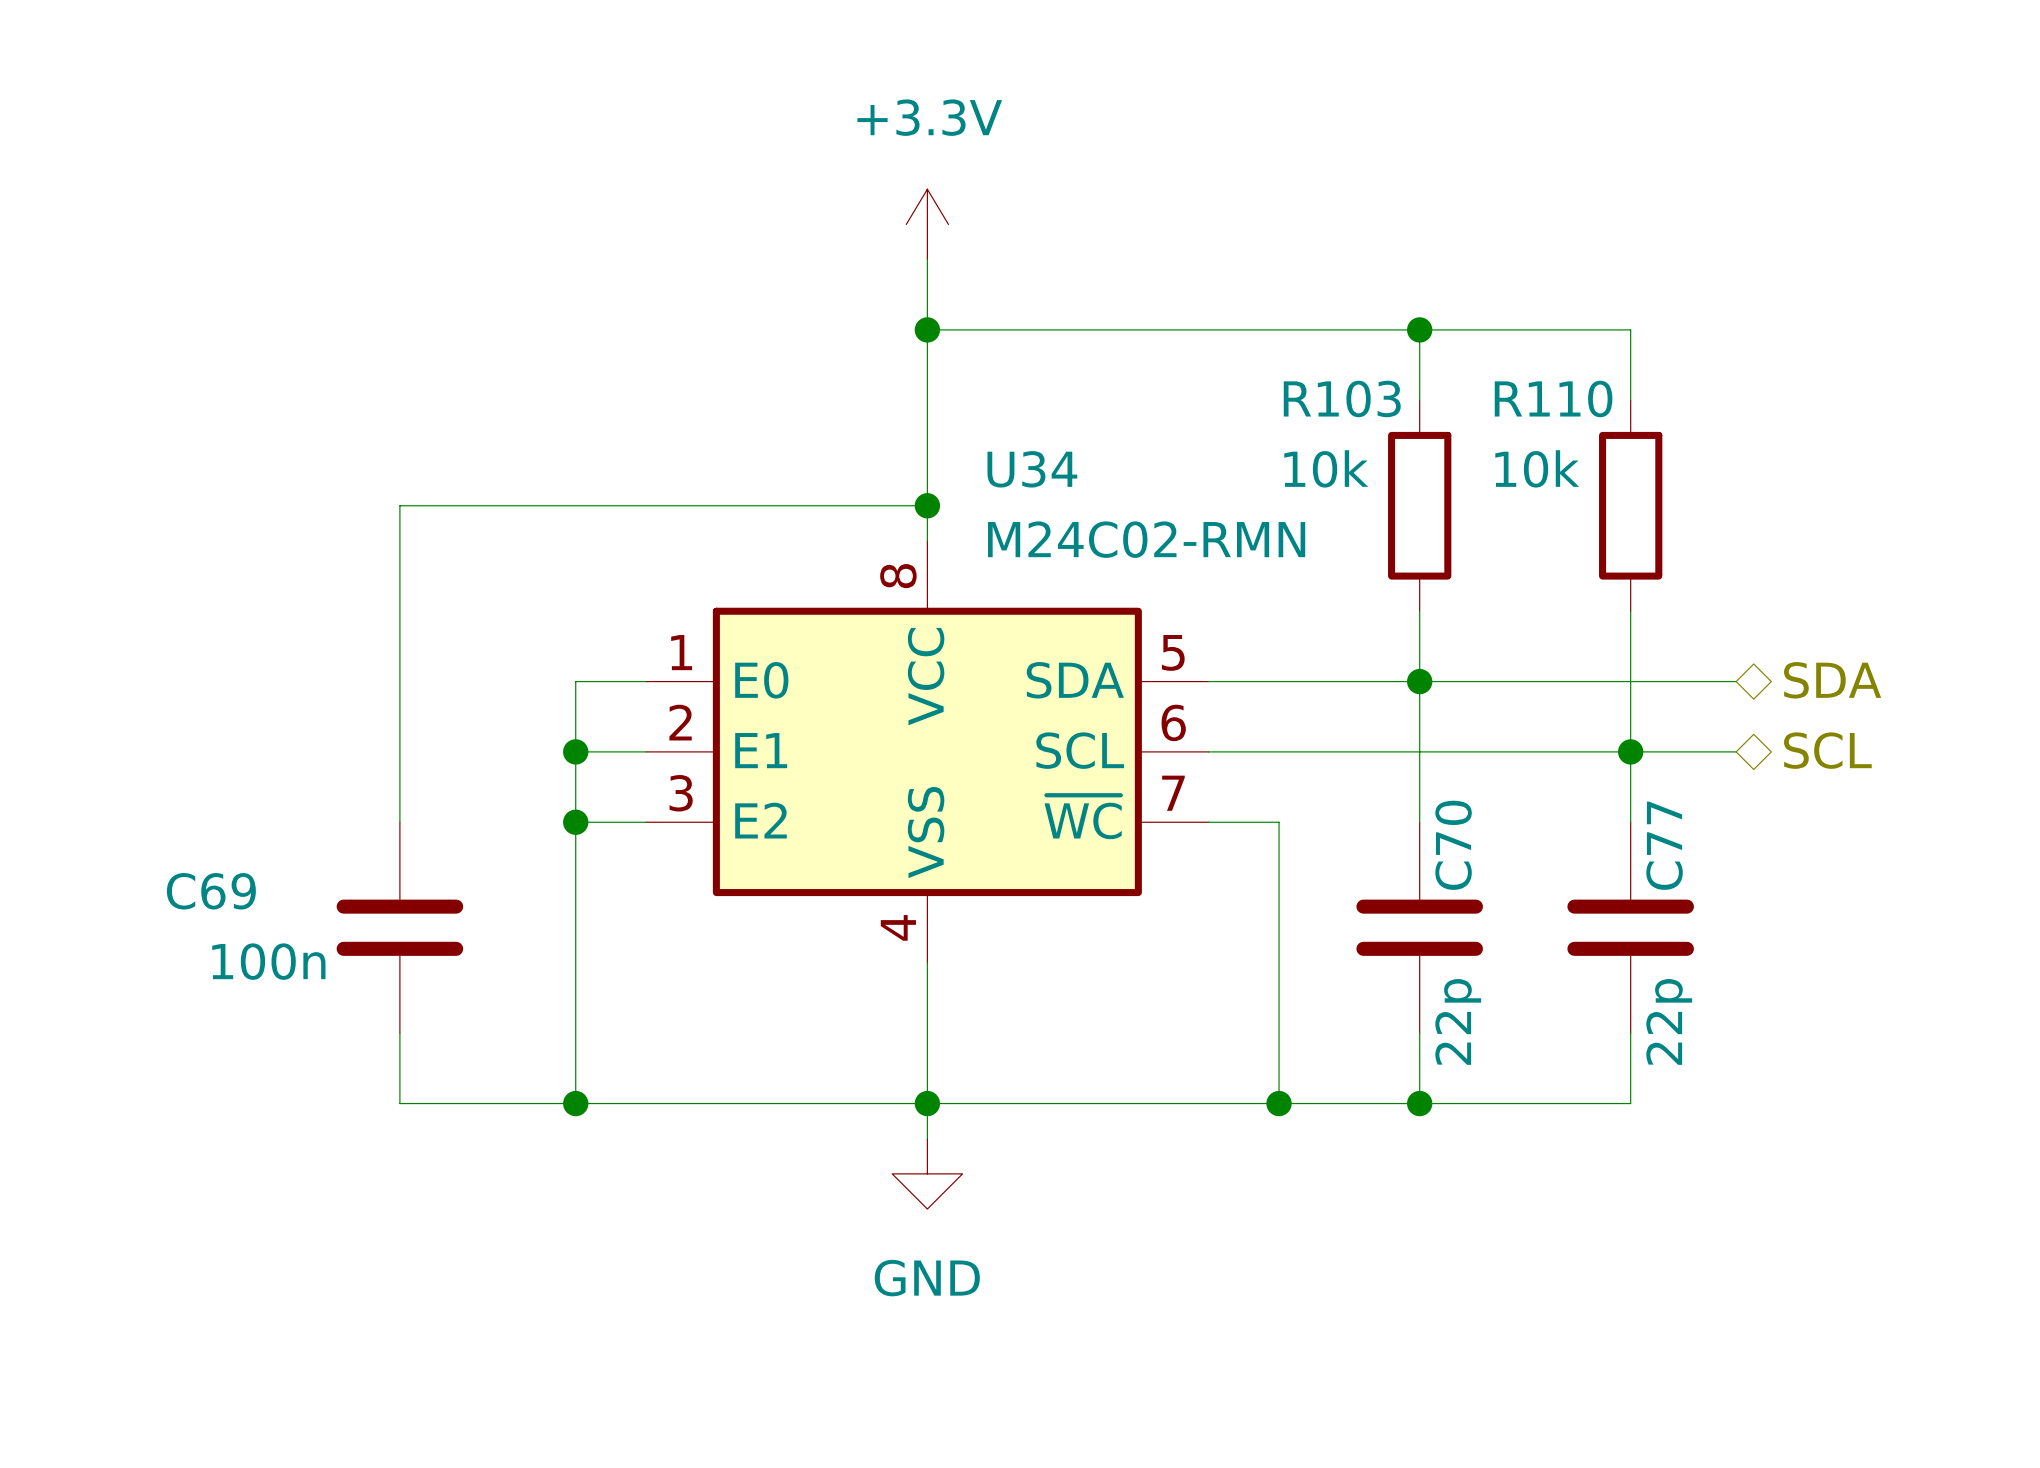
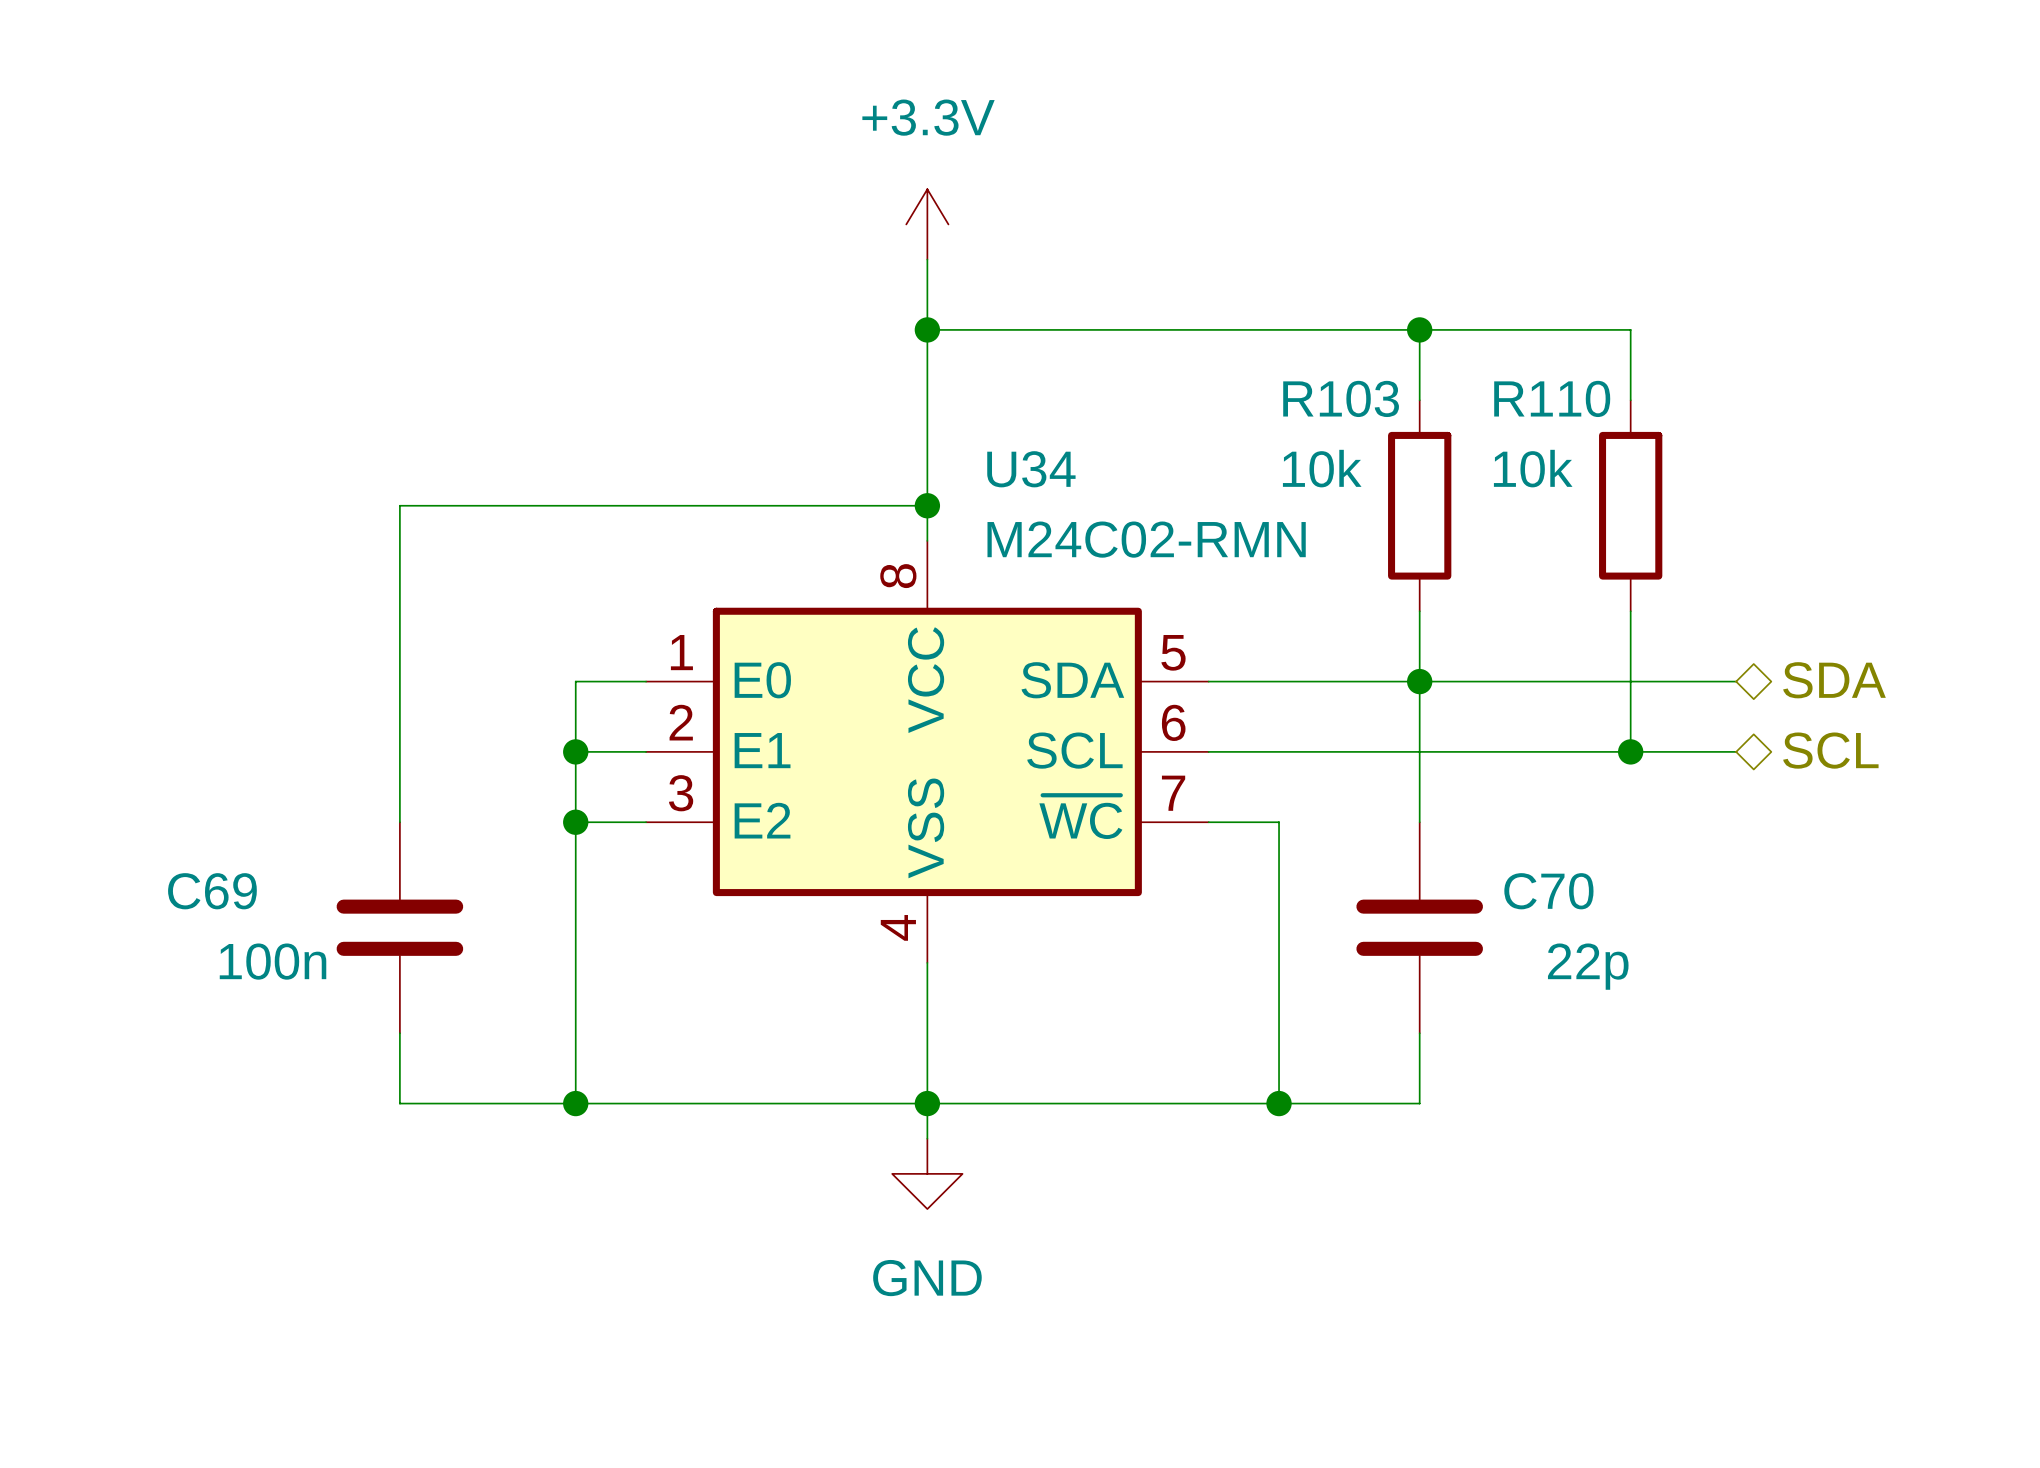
wire: (1630, 751) (1630, 822) -> none
C70 name rotation: 0° (1453, 845) -> 90° clockwise (1548, 891)
C77: 22p (1630, 927) -> none
C70 value rotation: 0° (1458, 1021) -> 90° clockwise (1588, 966)
C70 value position: 22p (1458, 1021) -> 22p (1588, 966)
wire: (1630, 1033) (1630, 1103) (1419, 1103) -> none
junction: (1419, 1103) -> none

